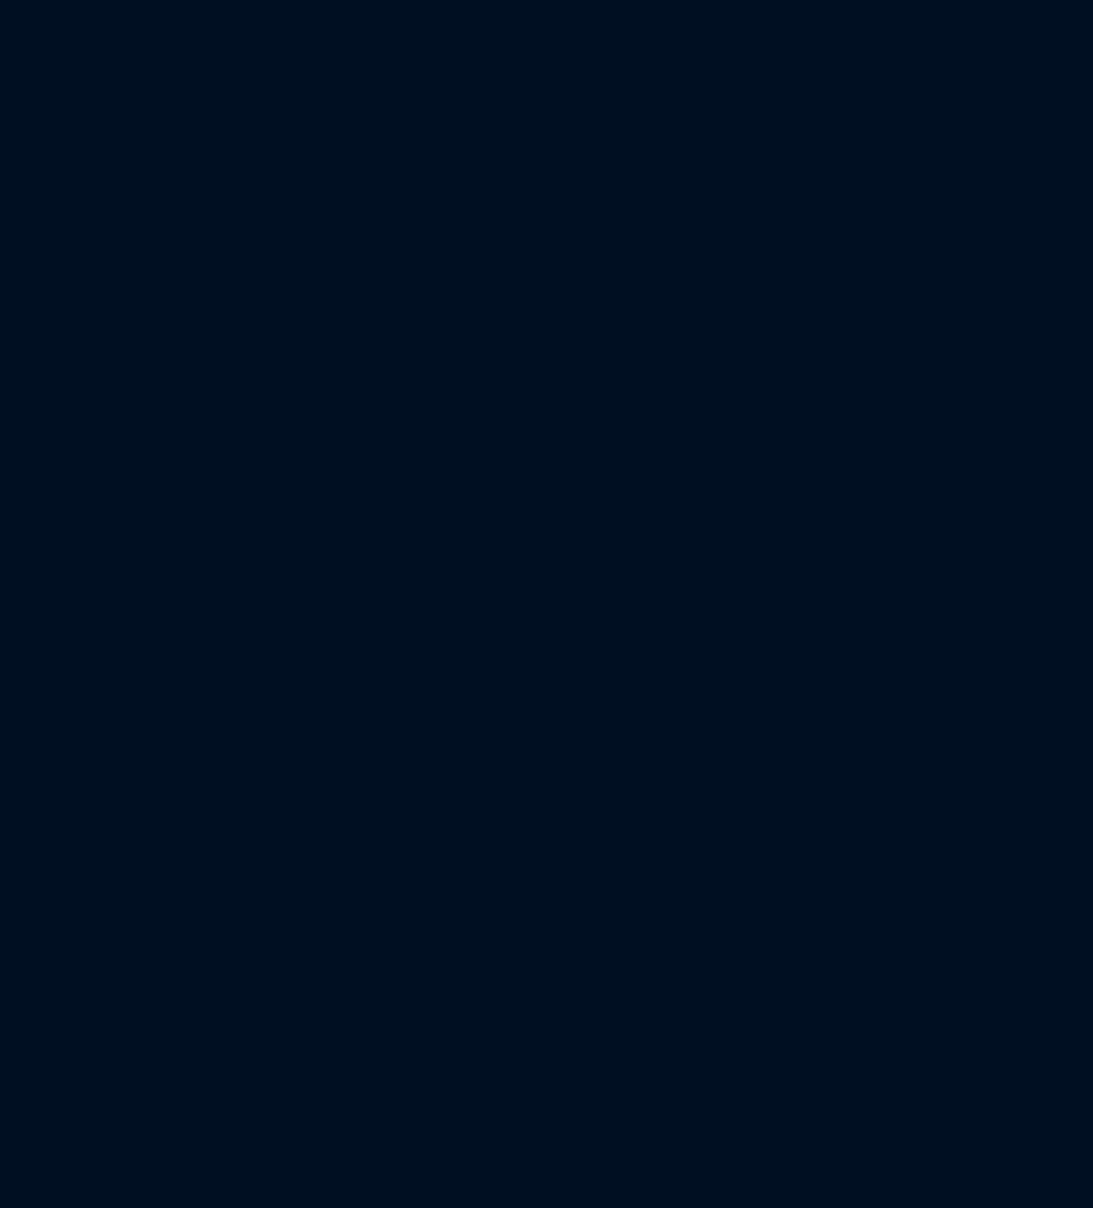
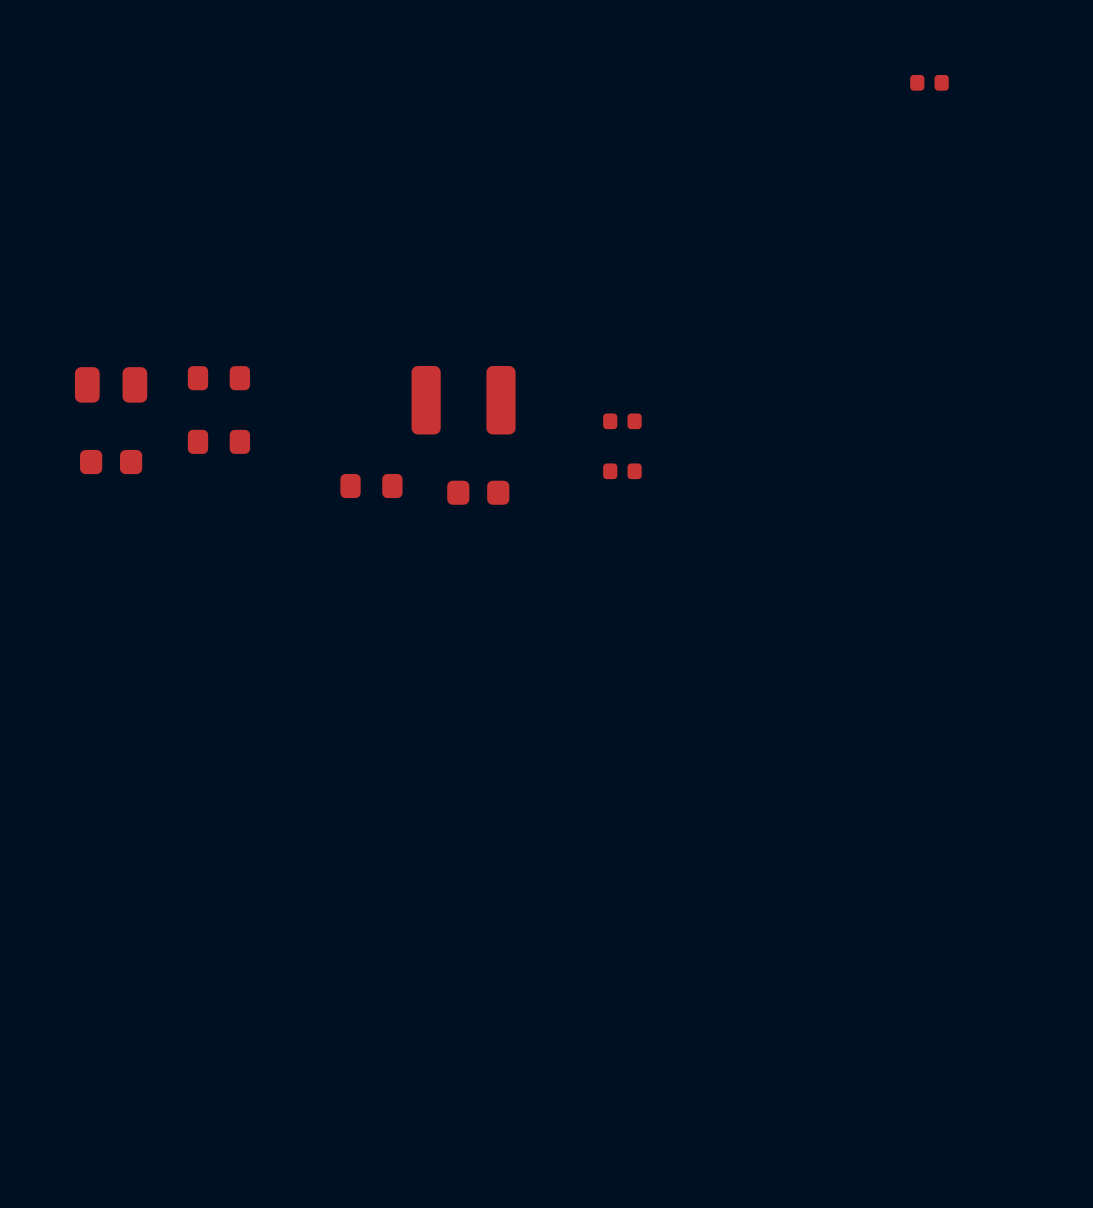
part: none -> (929, 82)
part: none -> (218, 378)
part: none -> (111, 384)
part: none -> (463, 400)
part: none -> (622, 421)
part: none -> (218, 441)
part: none -> (111, 462)
part: none -> (622, 471)
part: none -> (371, 486)
part: none -> (478, 492)

